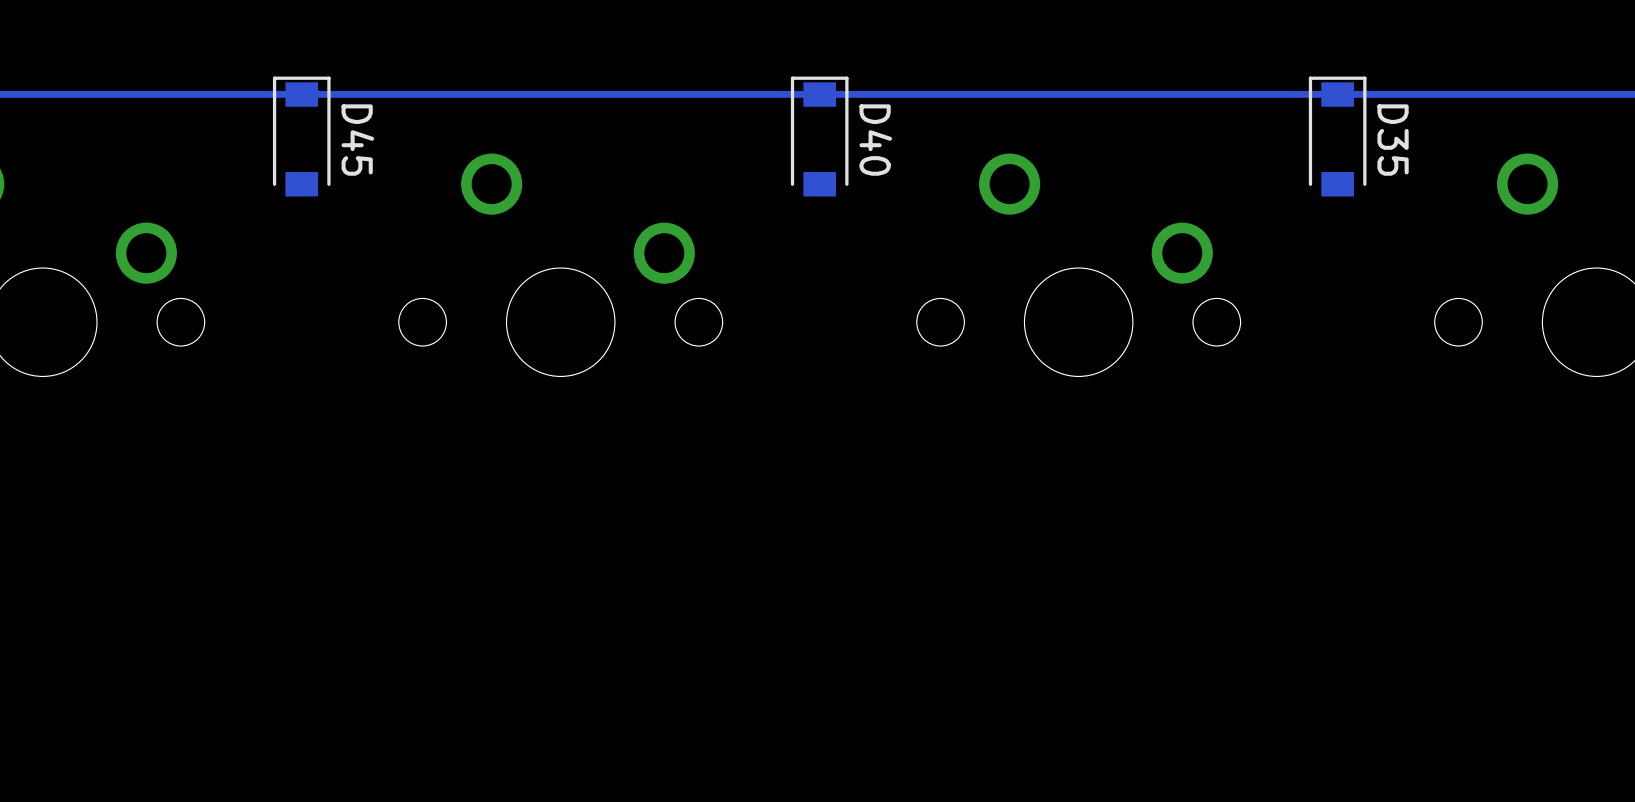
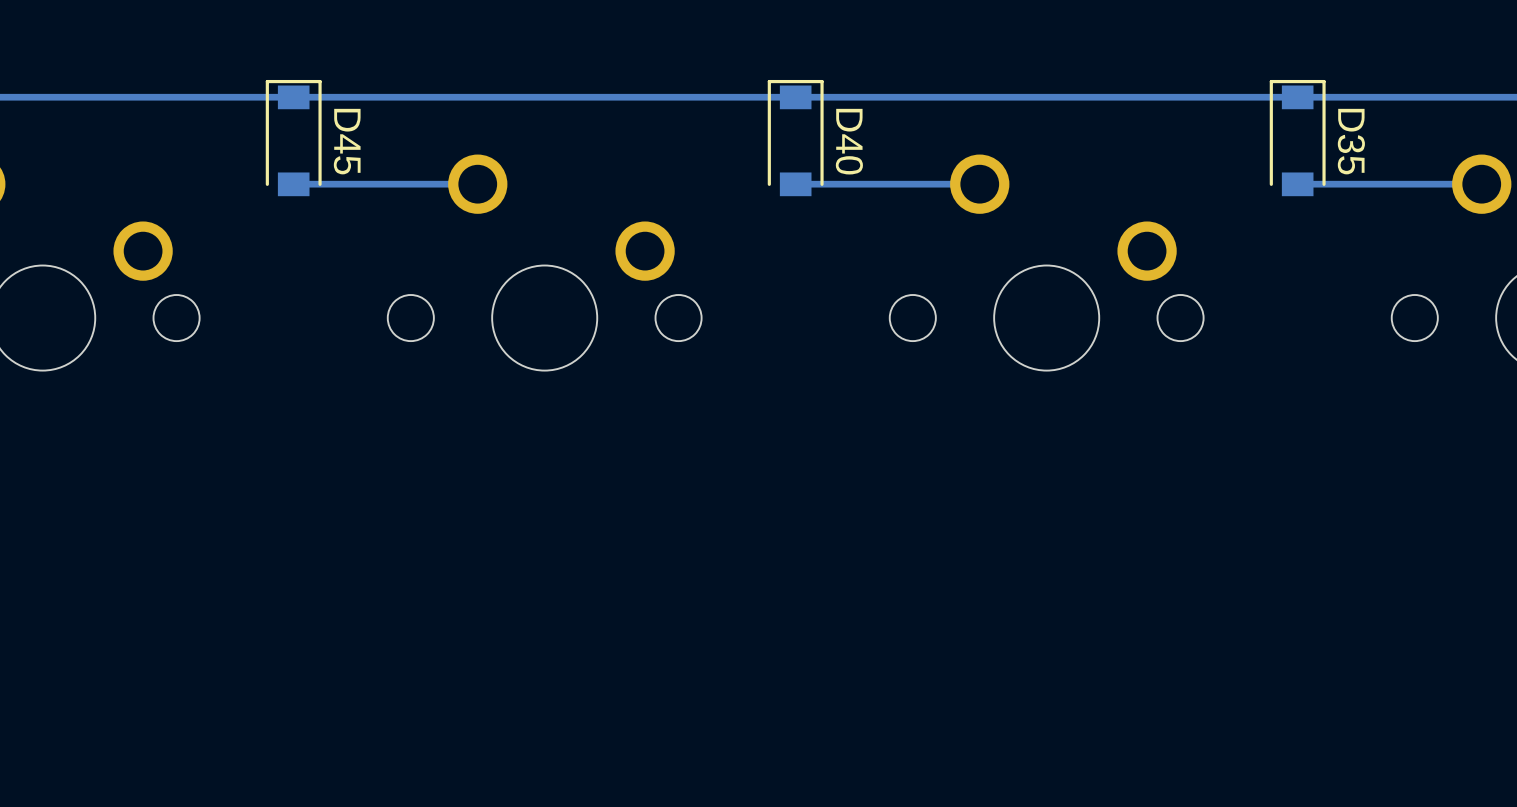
bottom track: none -> (477, 184) (295, 184)
bottom track: none -> (979, 184) (797, 184)
bottom track: none -> (1481, 184) (1299, 184)

